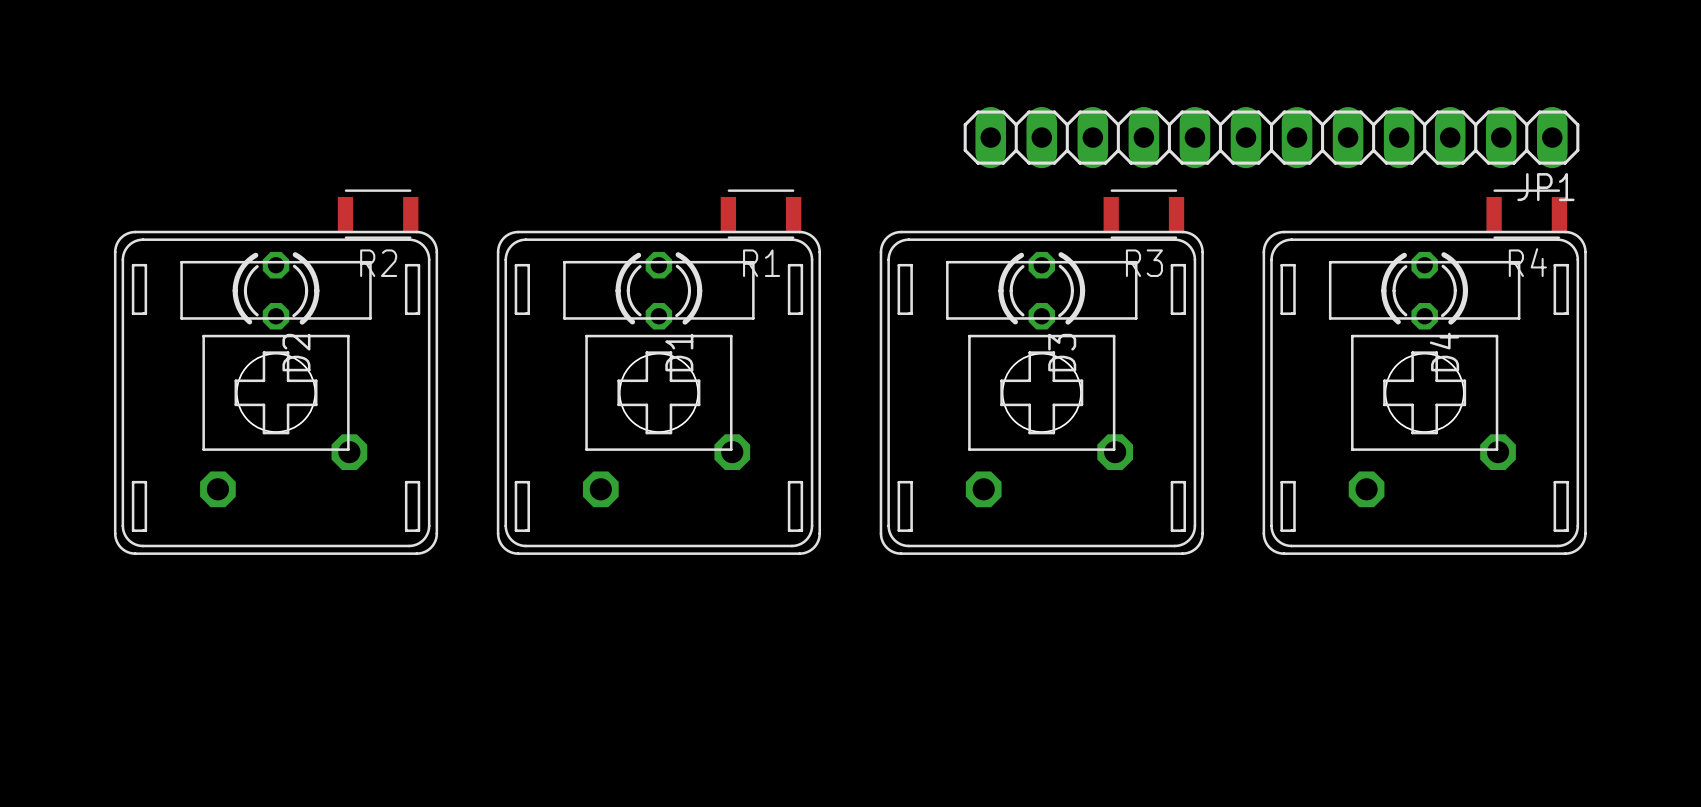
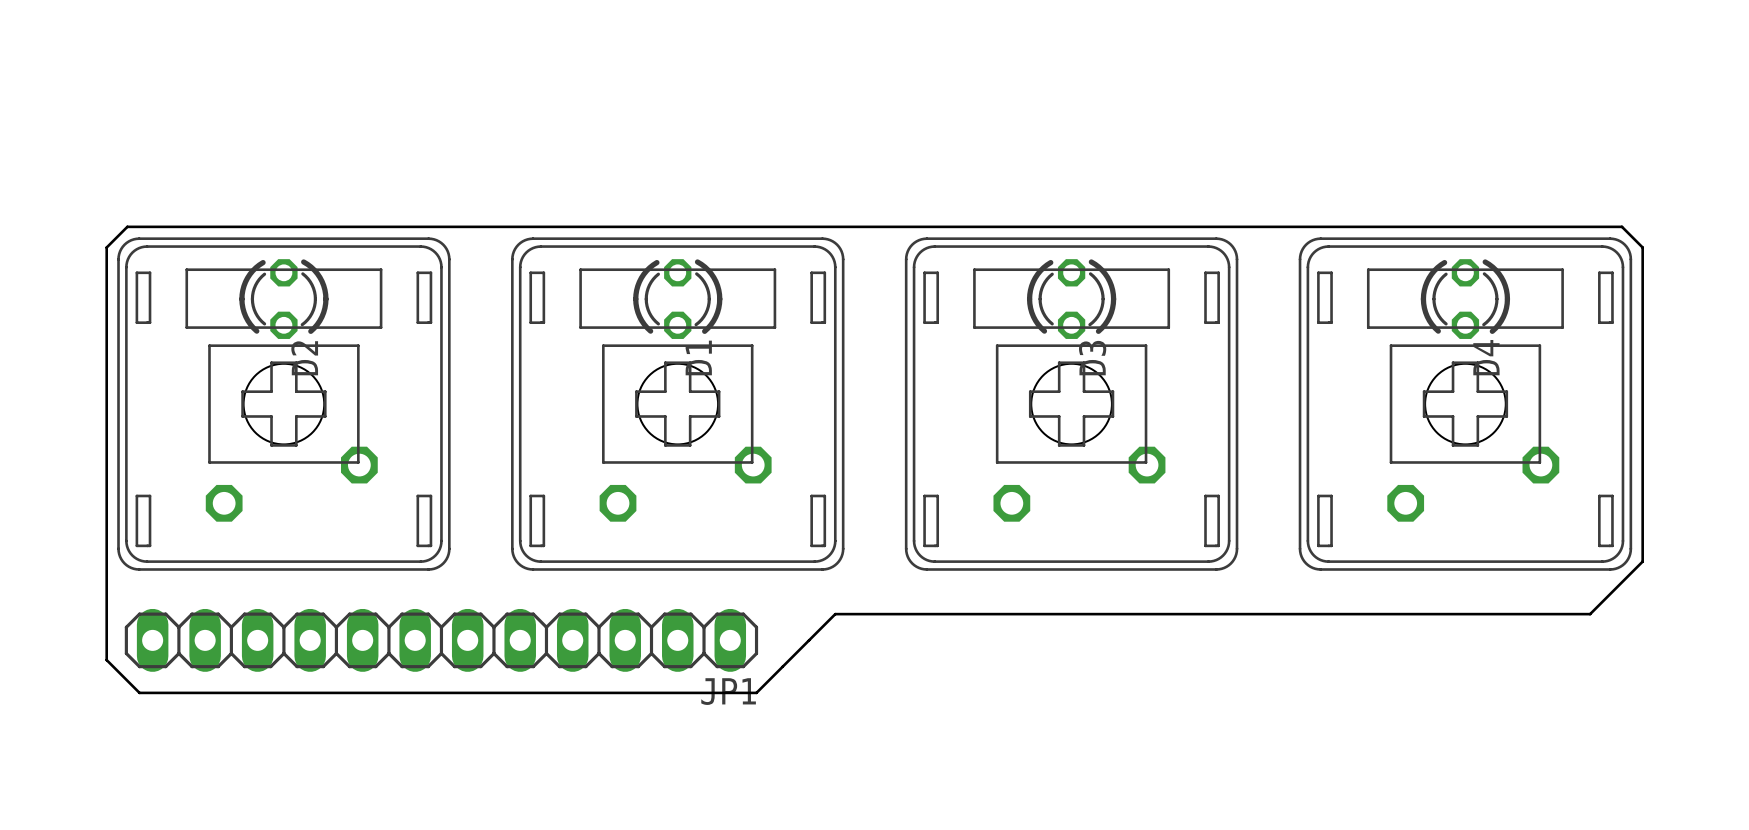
JP1 position: (1271, 137) -> (441, 640)
R2: (378, 214) -> none
R1: (761, 214) -> none
R3: (1143, 214) -> none
R4: (1526, 214) -> none
board edge: none -> (127, 226) (1621, 226) (1642, 247) (1642, 561) (1590, 614) (835, 614) (756, 692) (139, 692) (106, 660) (106, 247) (127, 226)

